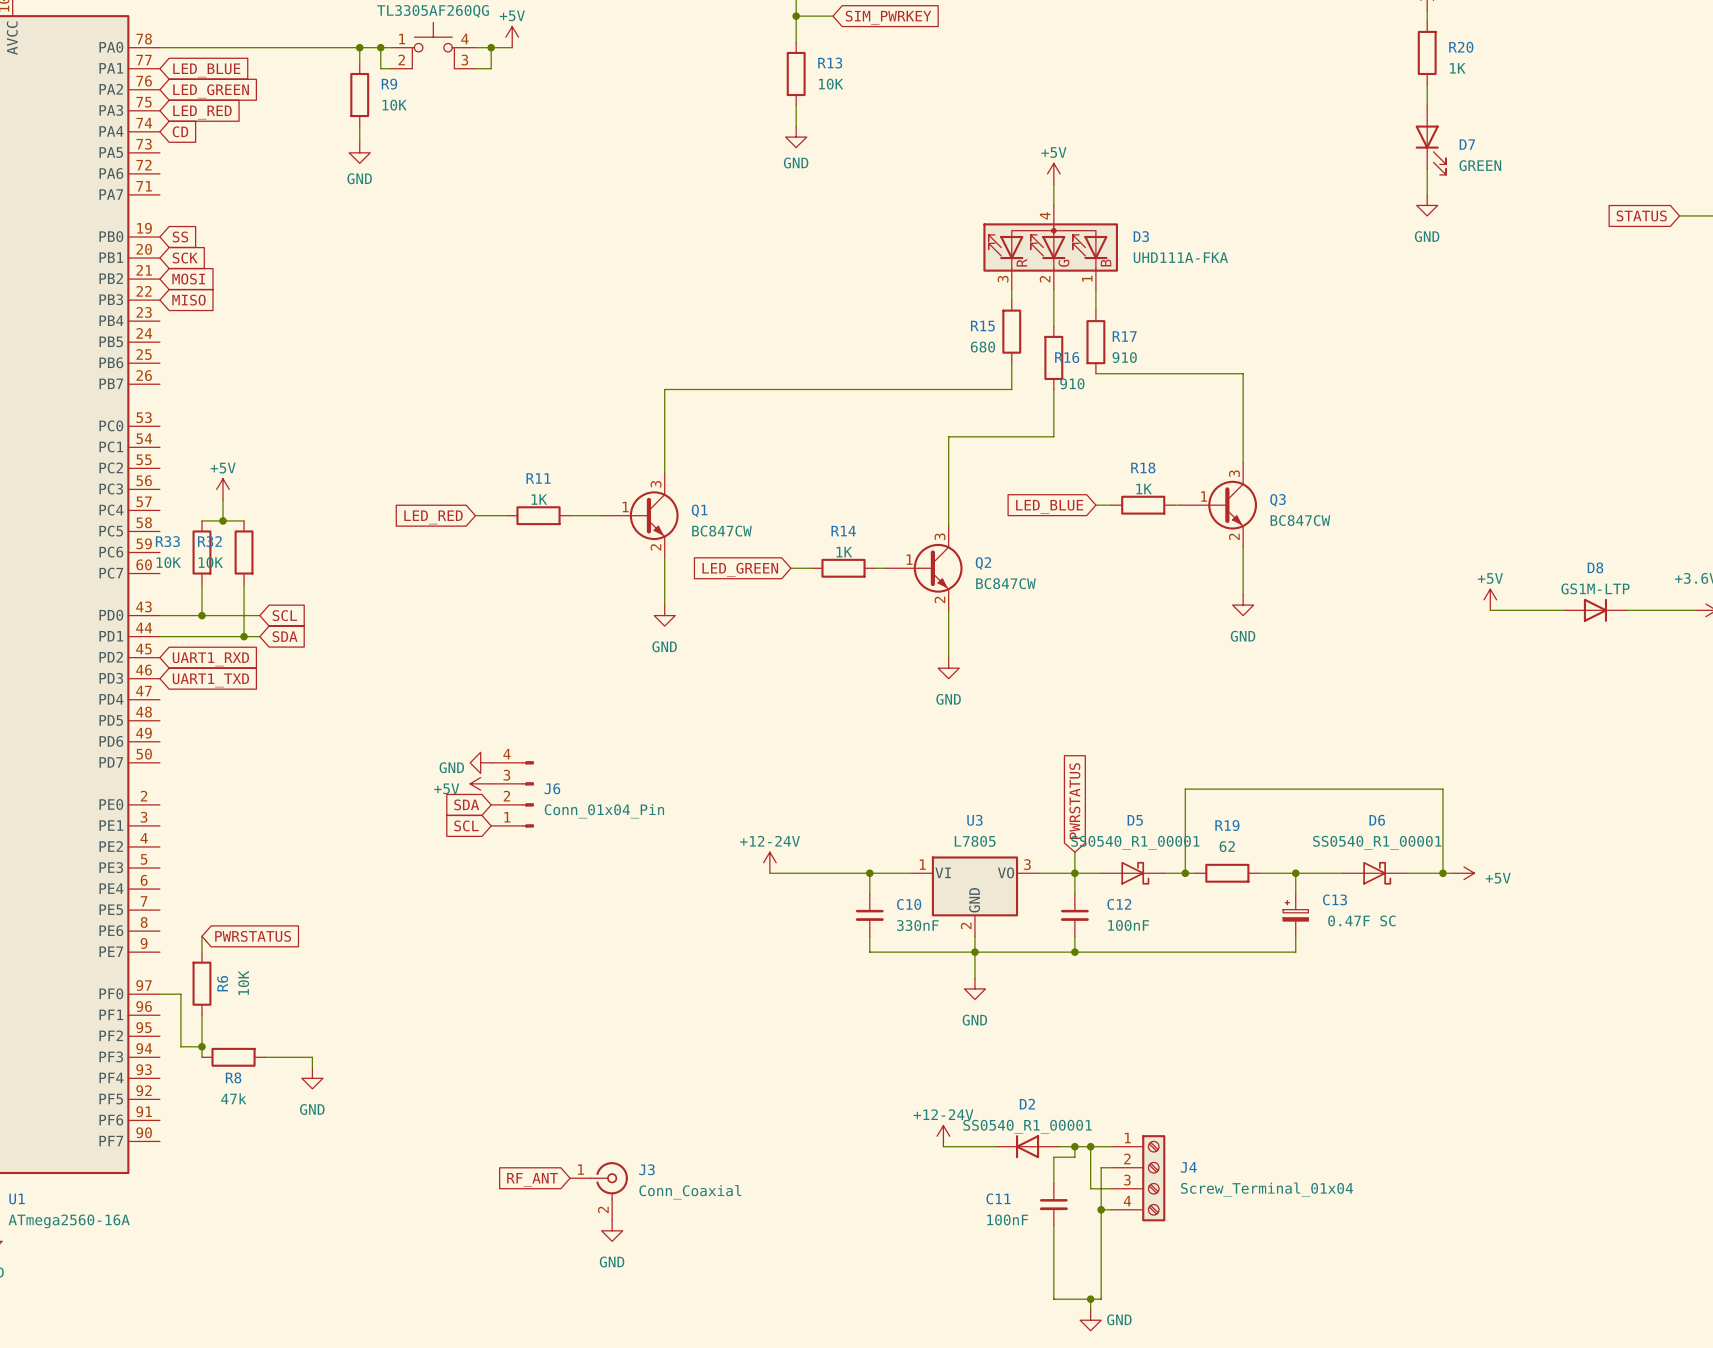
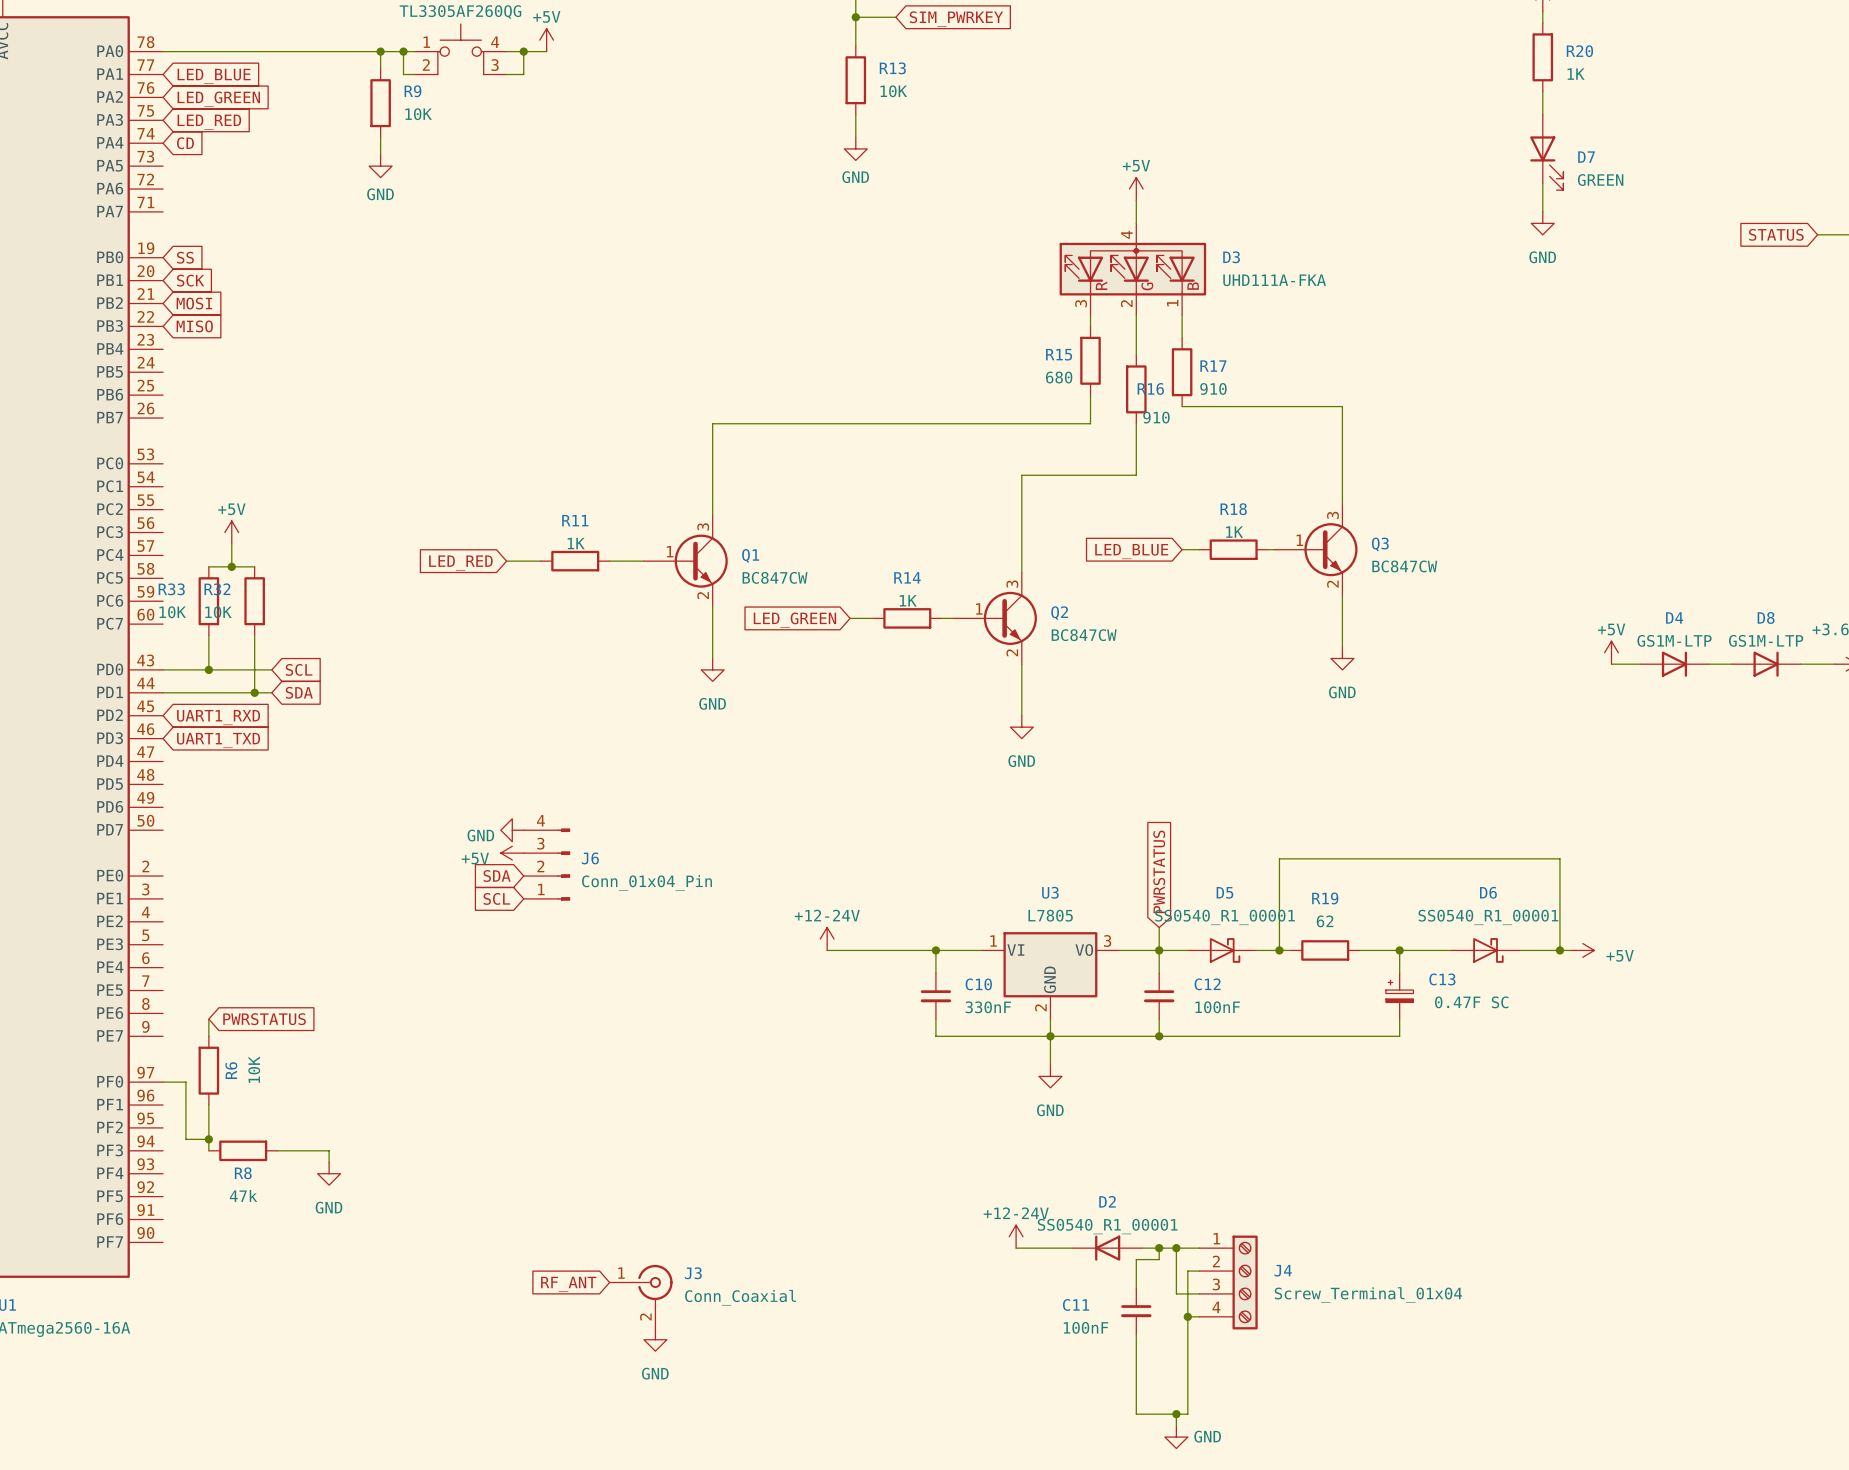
D4: none -> GS1M-LTP (1674, 664)
D8 position: (1595, 610) -> (1766, 664)

